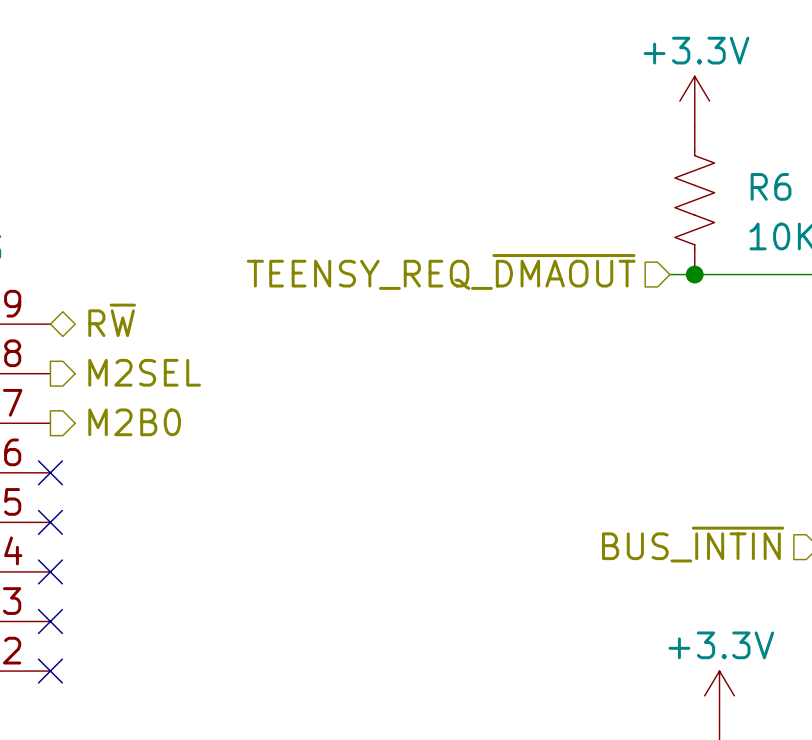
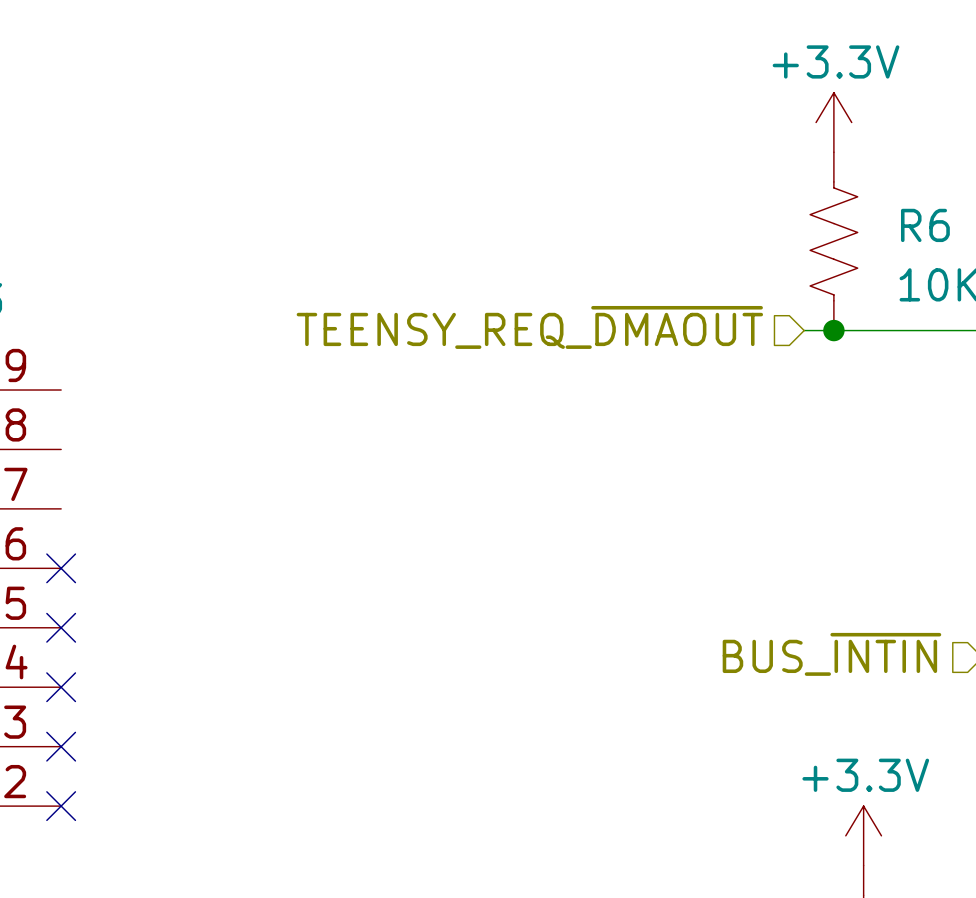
hierarchical label: R~{W} (112, 320) -> none
hierarchical label: M2SEL (144, 372) -> none
hierarchical label: M2B0 (134, 422) -> none

